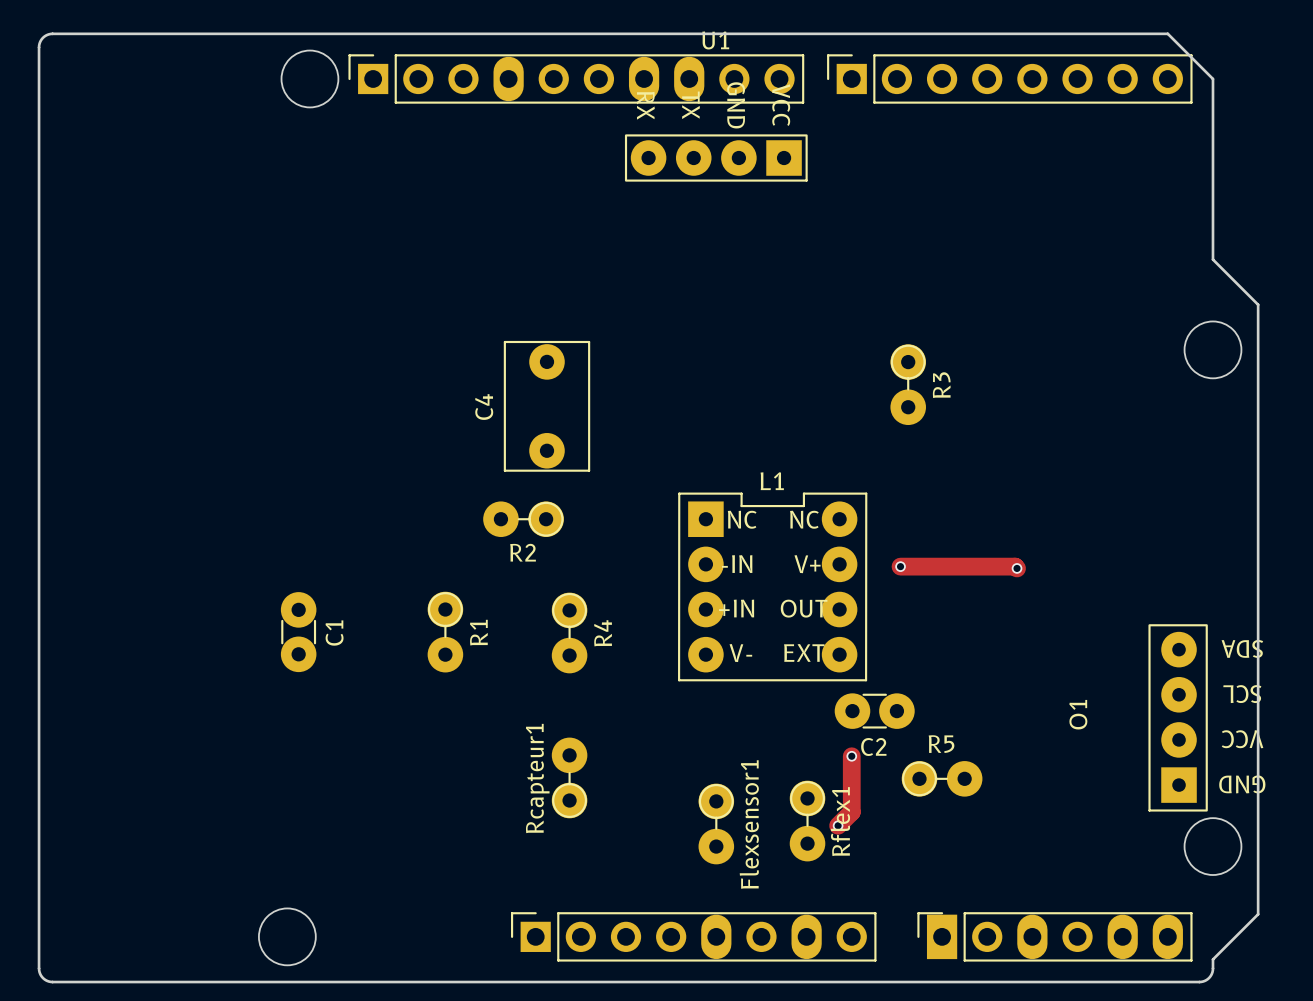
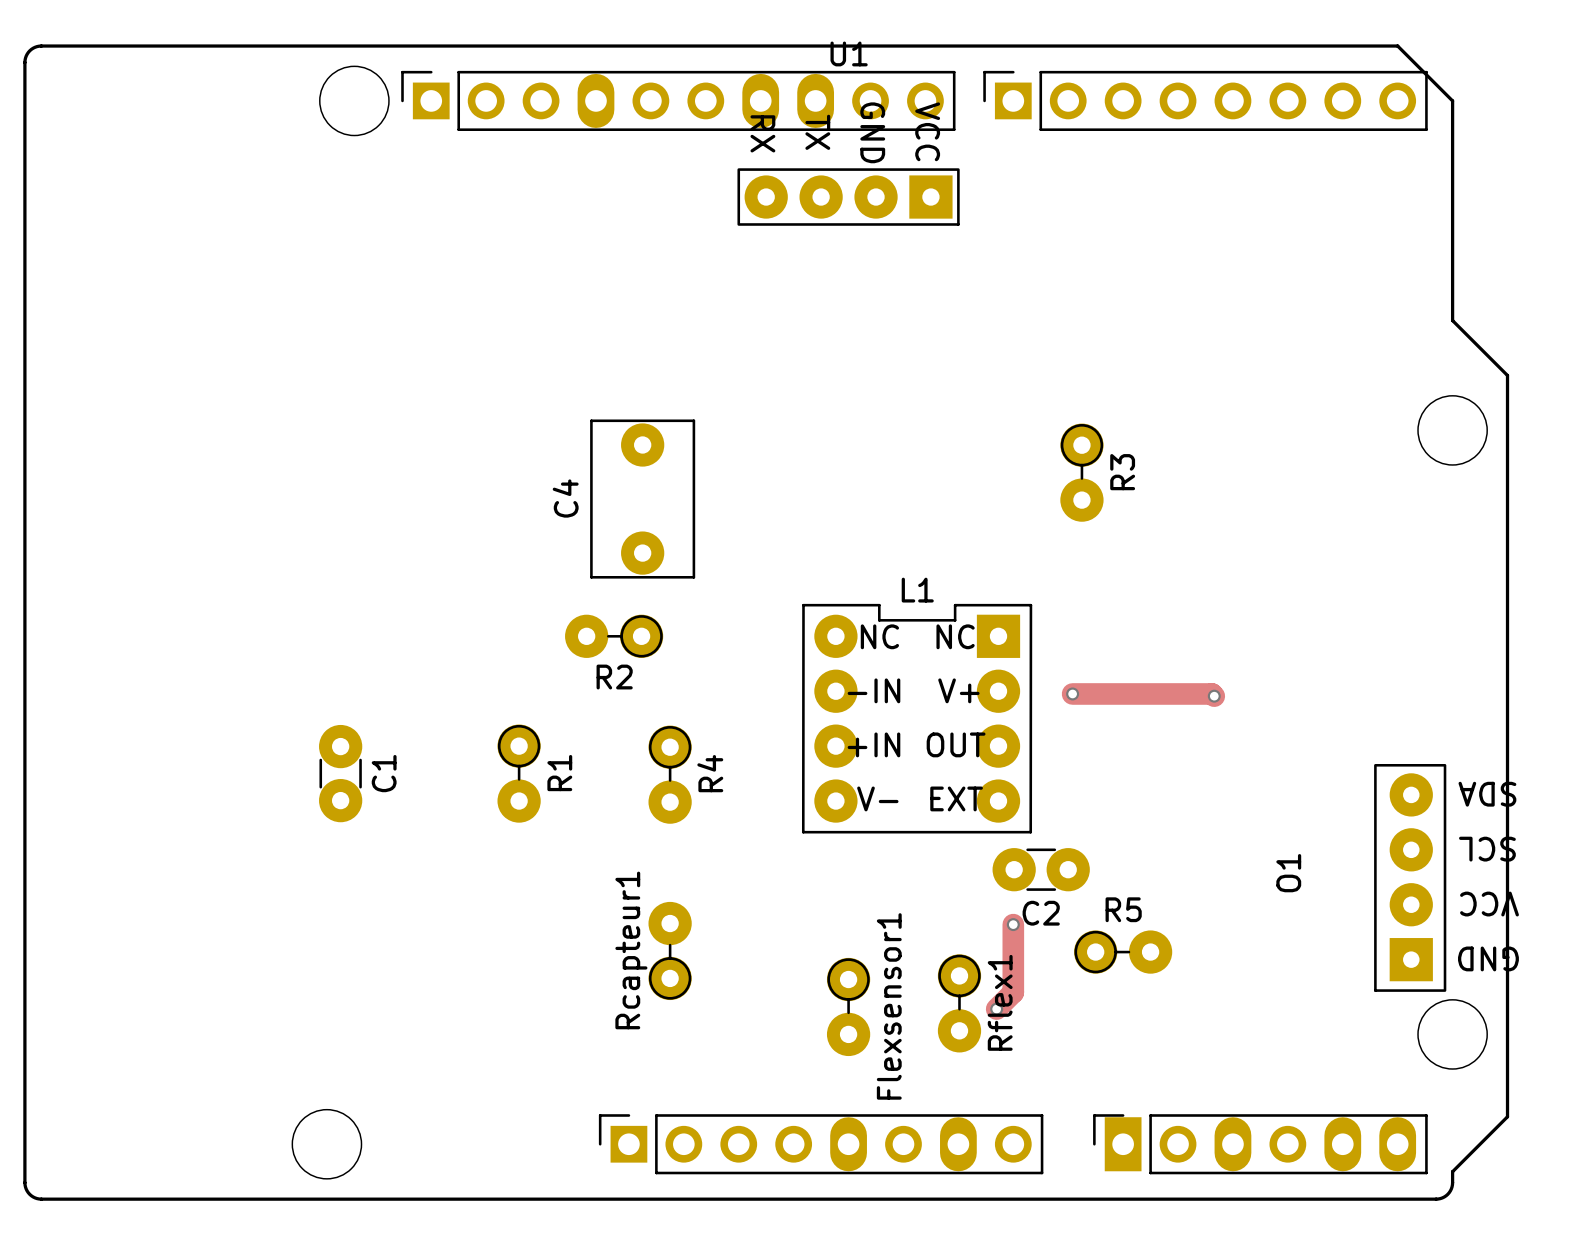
L1 footprint: [678, 492, 868, 682] -> [801, 603, 1033, 834]

